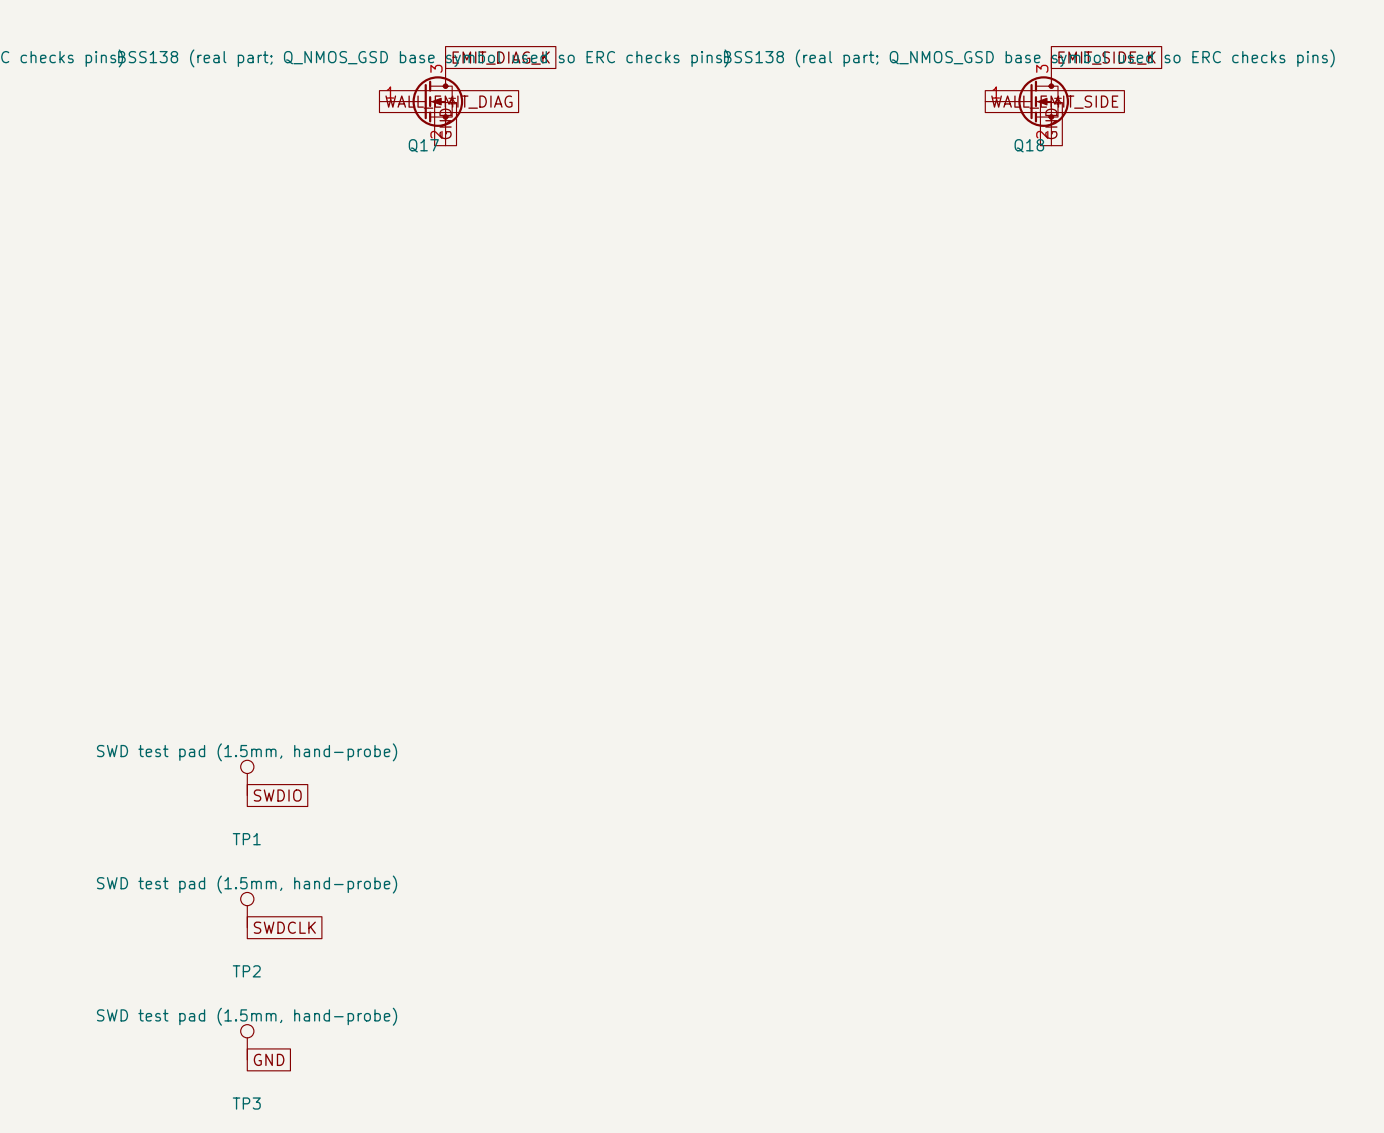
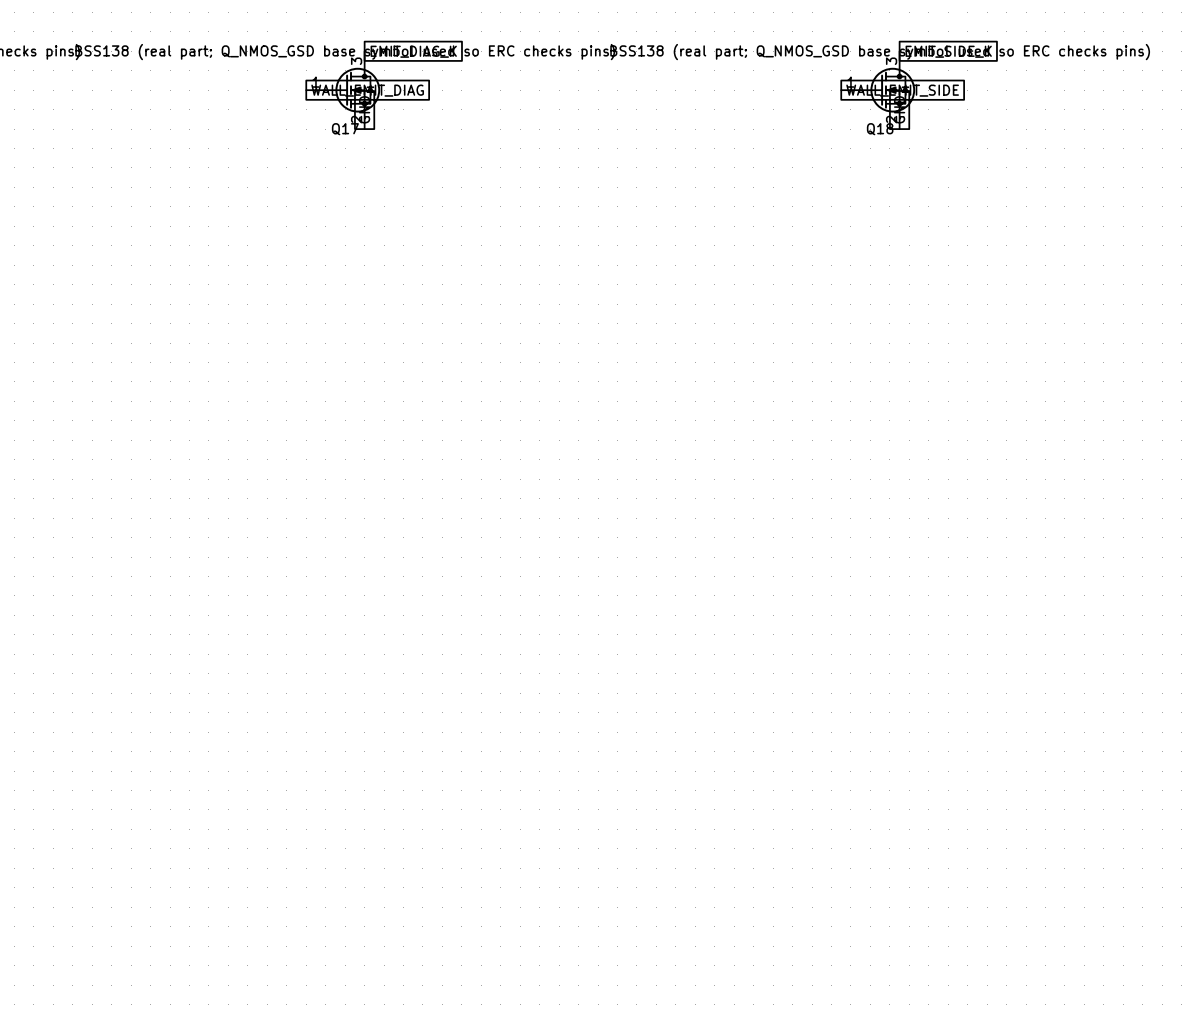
TP1: SWD test pad (1.5mm, hand-probe) (247, 777) -> none
global label: SWDIO (277, 795) -> none
TP2: SWD test pad (1.5mm, hand-probe) (247, 910) -> none
global label: SWDCLK (284, 927) -> none
TP3: SWD test pad (1.5mm, hand-probe) (247, 1042) -> none
global label: GND (269, 1059) -> none

